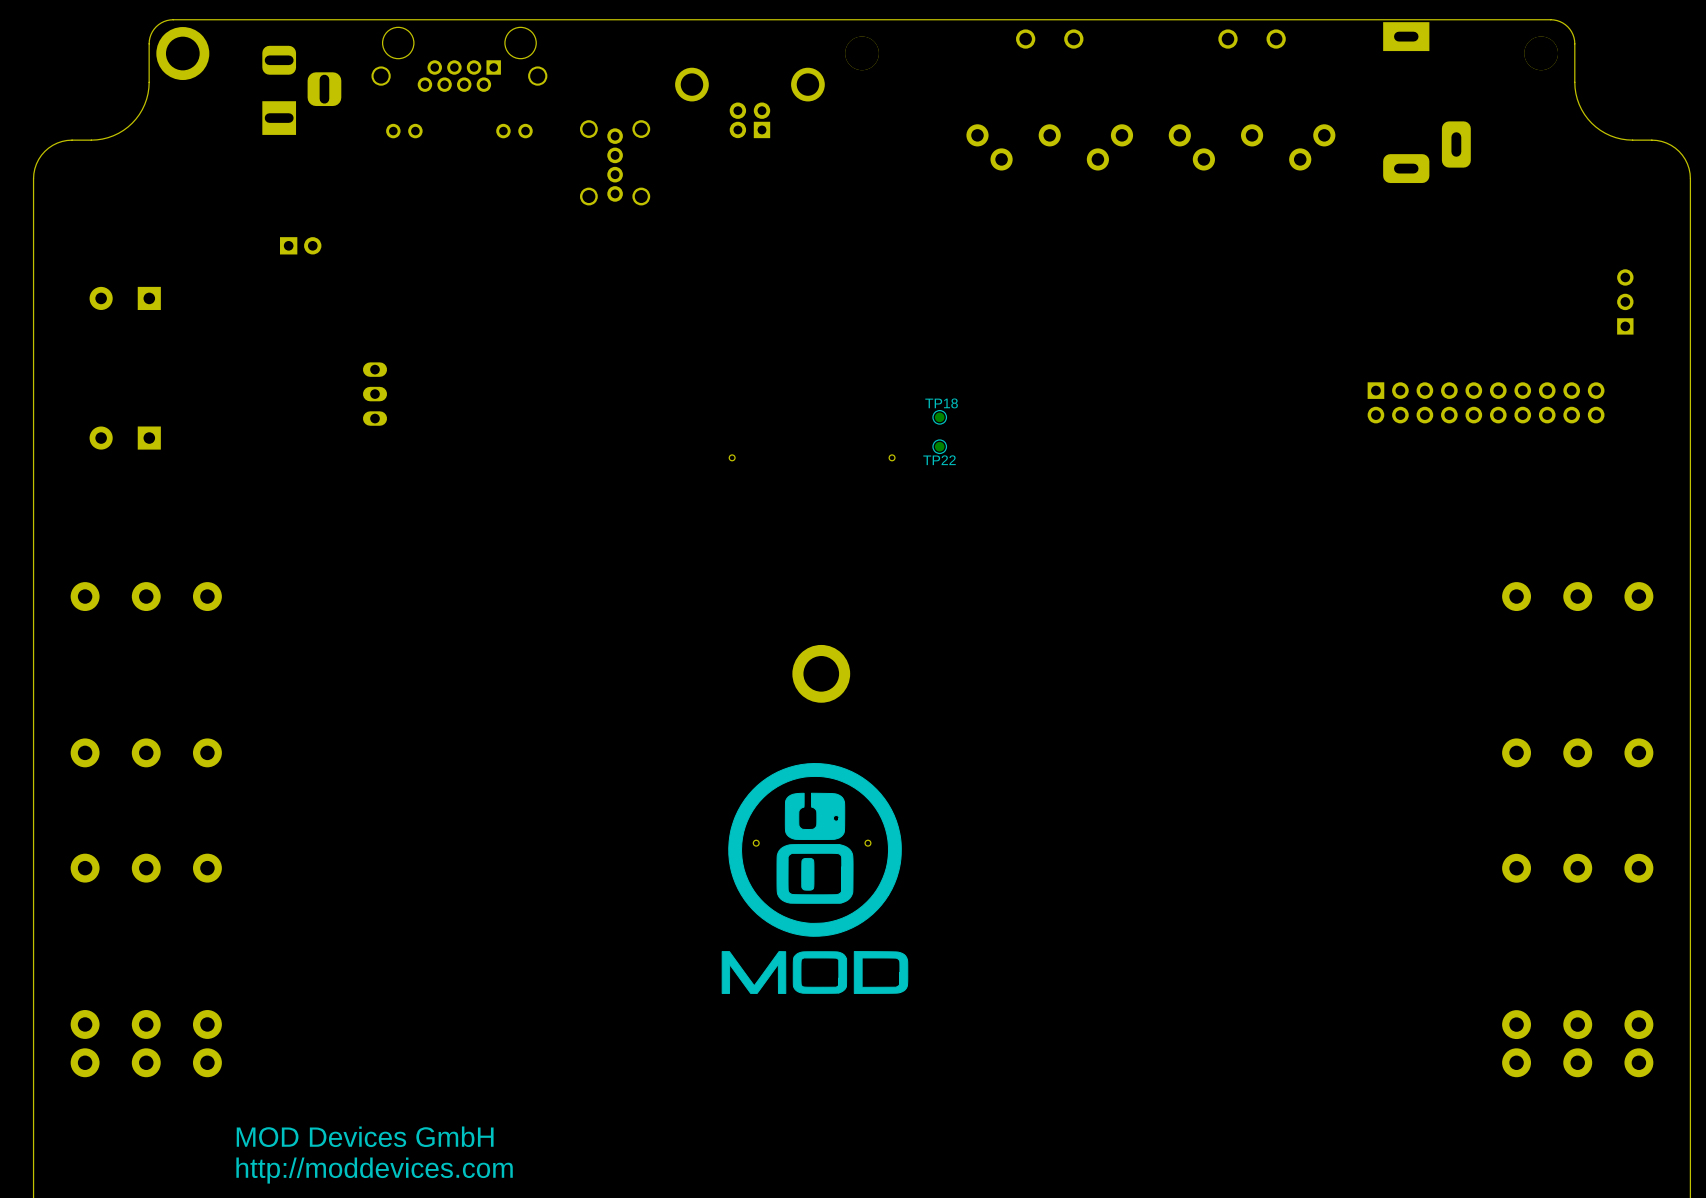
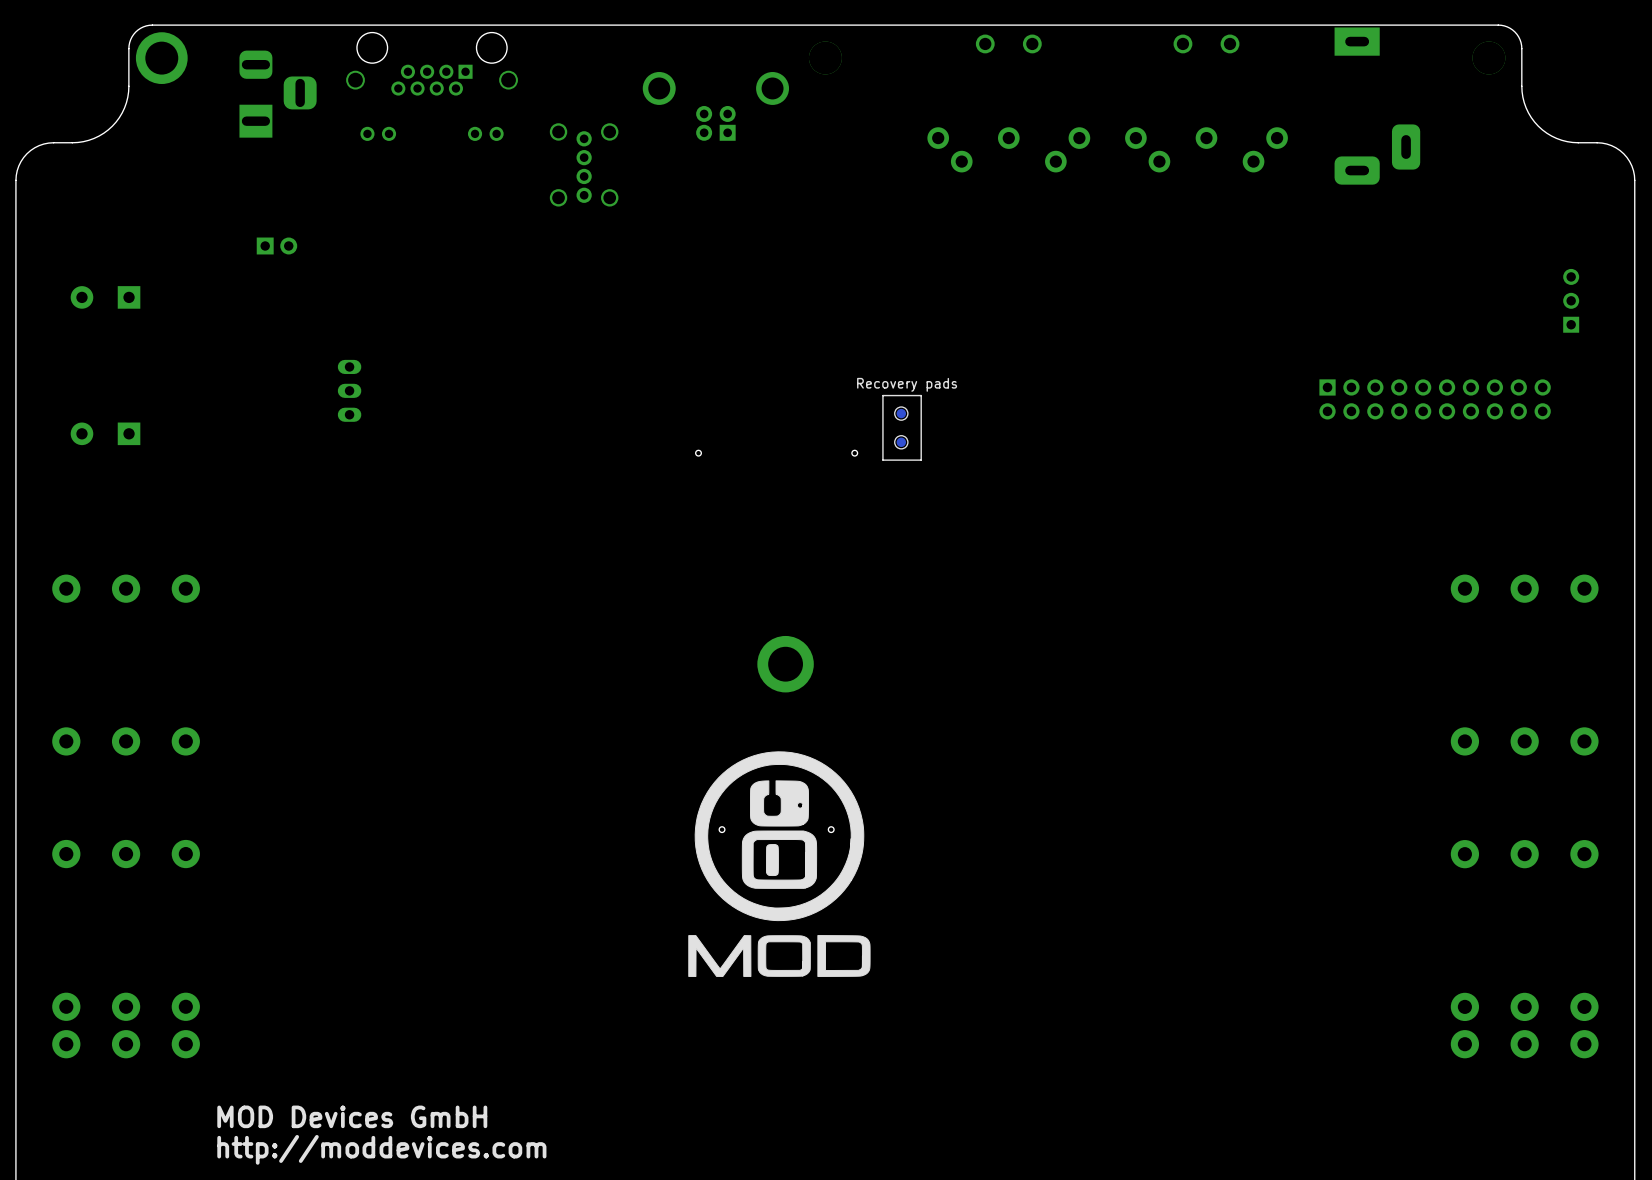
text: none -> Recovery pads (907, 384)
line: none -> (921, 395) (921, 460) (882, 460) (882, 395) (921, 395)
TP18 name: TP18 (941, 403) -> none
TP22 name: TP22 (939, 460) -> none

